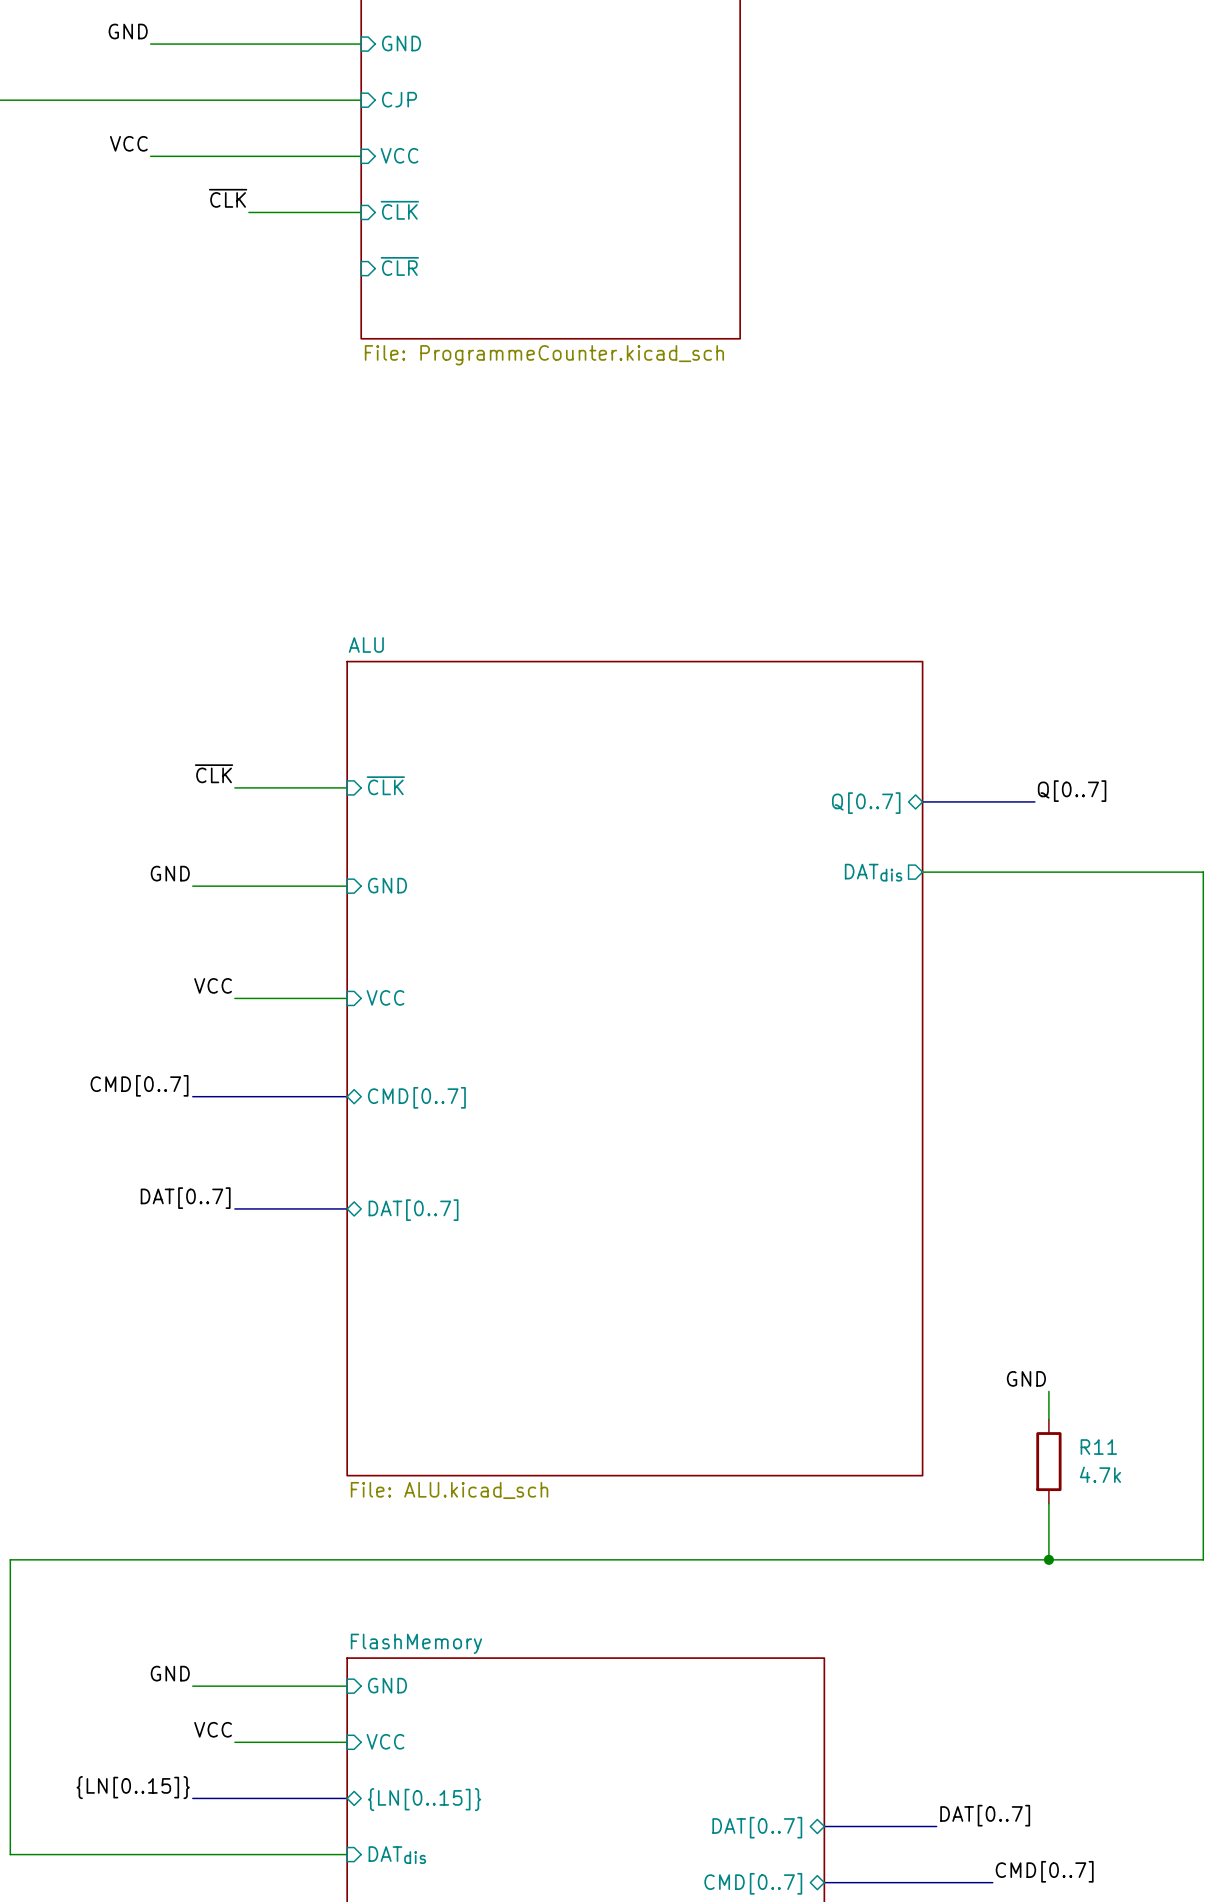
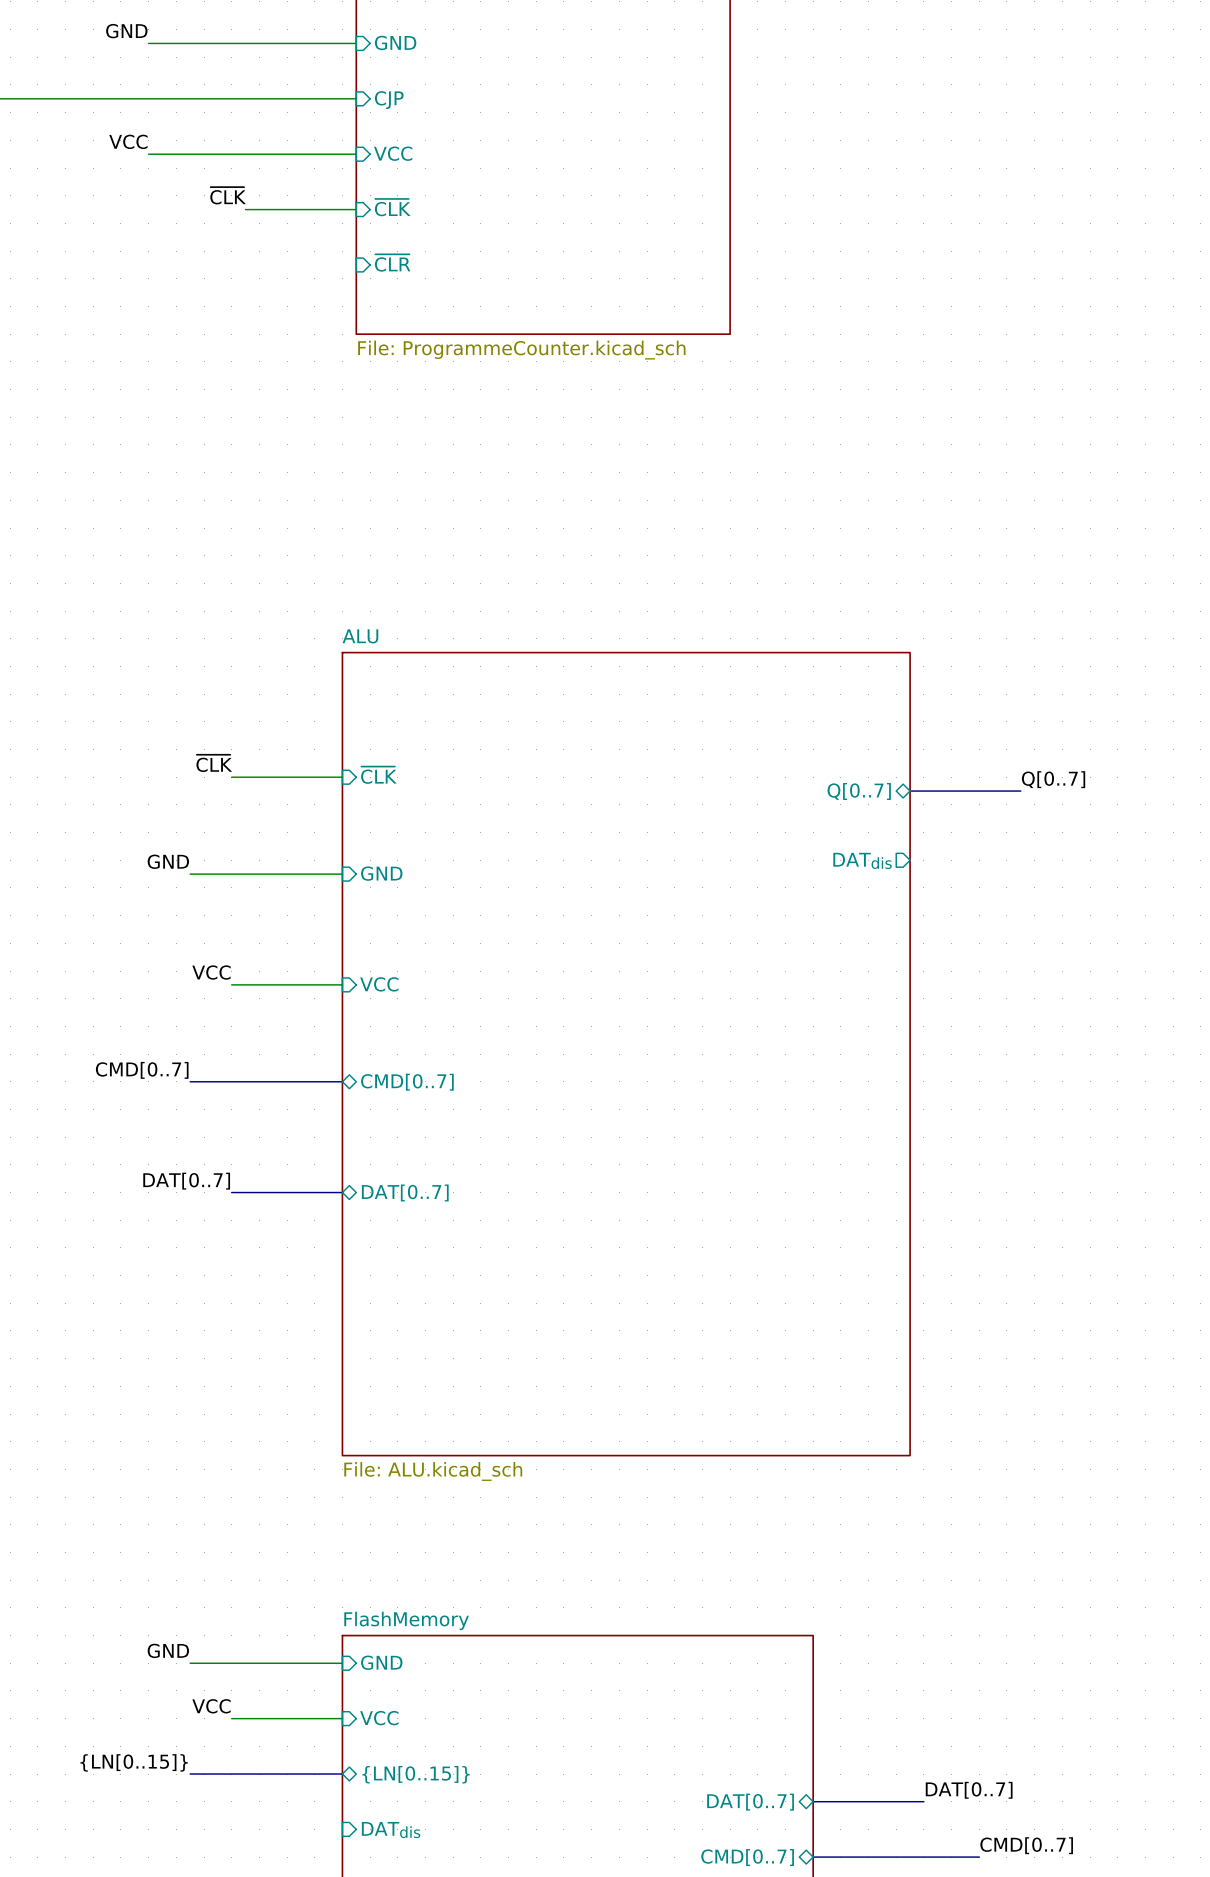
wire: (922, 872) (1203, 872) (1203, 1559) (10, 1559) (10, 1854) (347, 1854) -> none
label: GND (1026, 1378) -> none
wire: (1048, 1391) (1048, 1419) -> none
R11: 4.7k (1048, 1461) -> none
wire: (1048, 1503) (1048, 1559) -> none
junction: (1048, 1559) -> none

